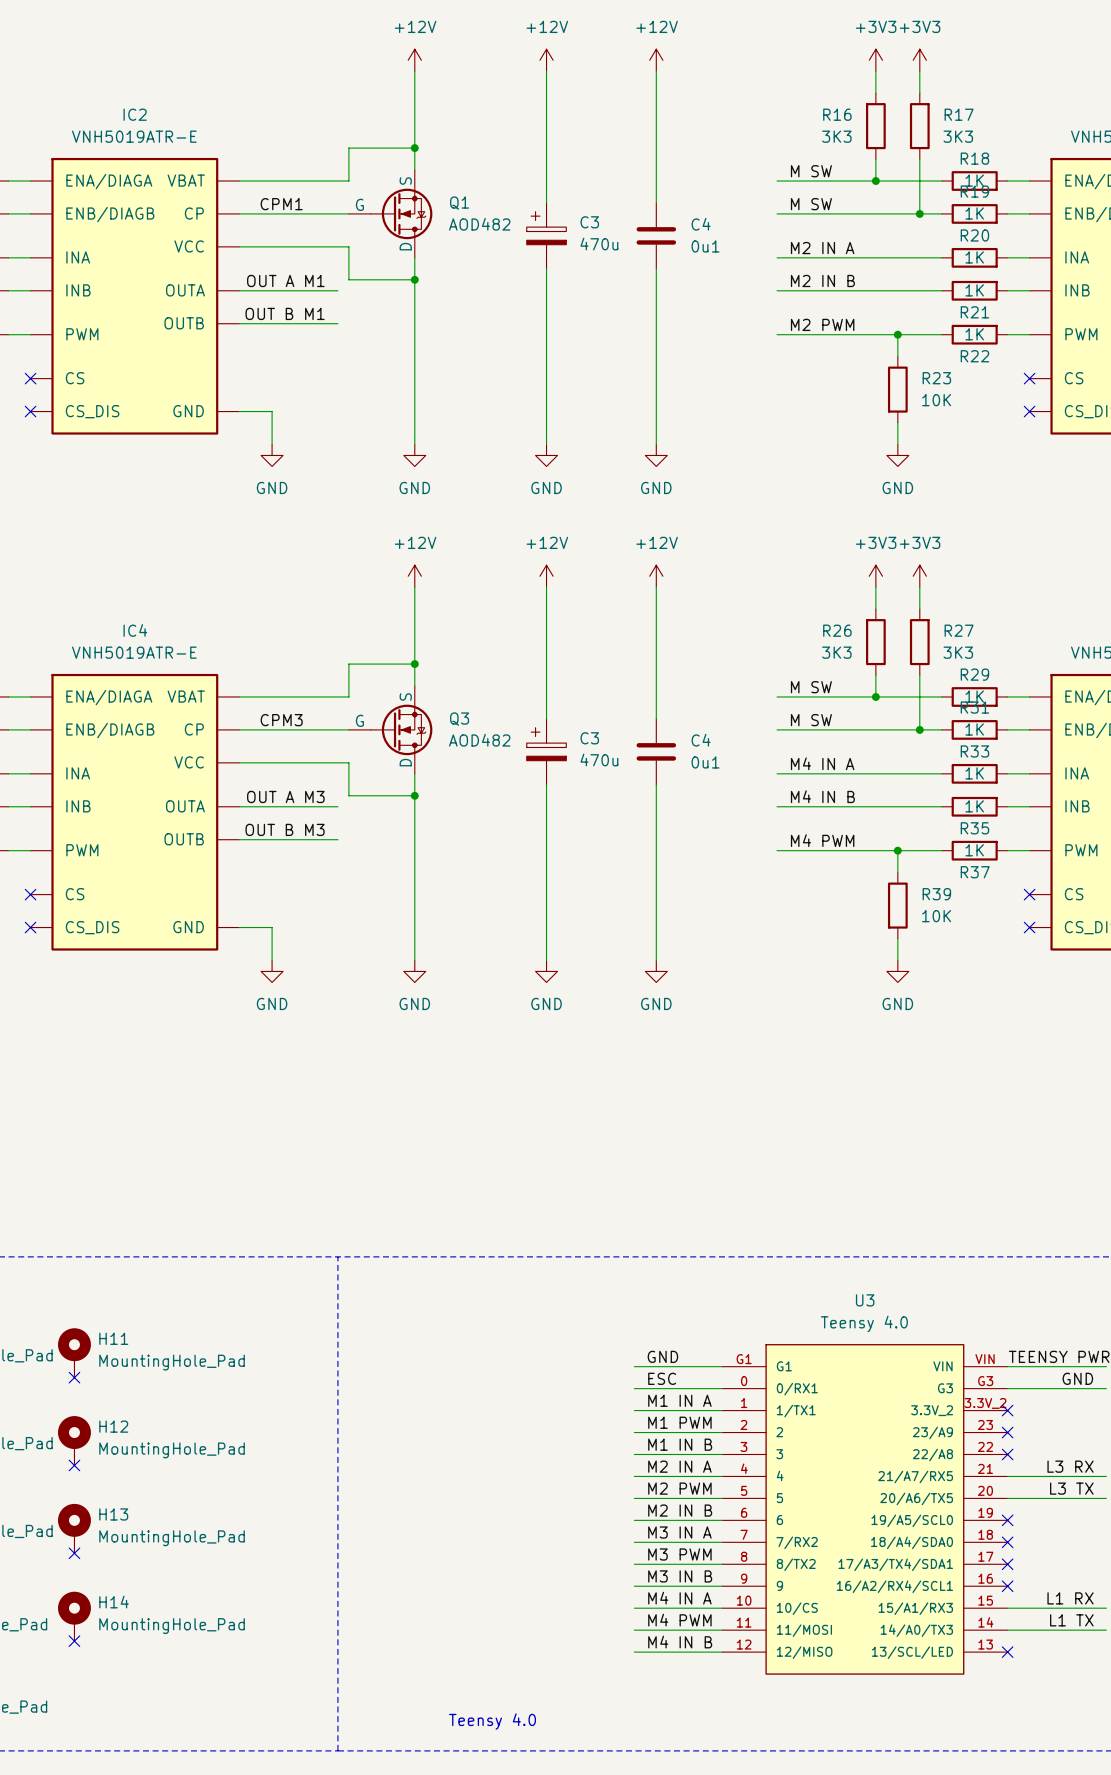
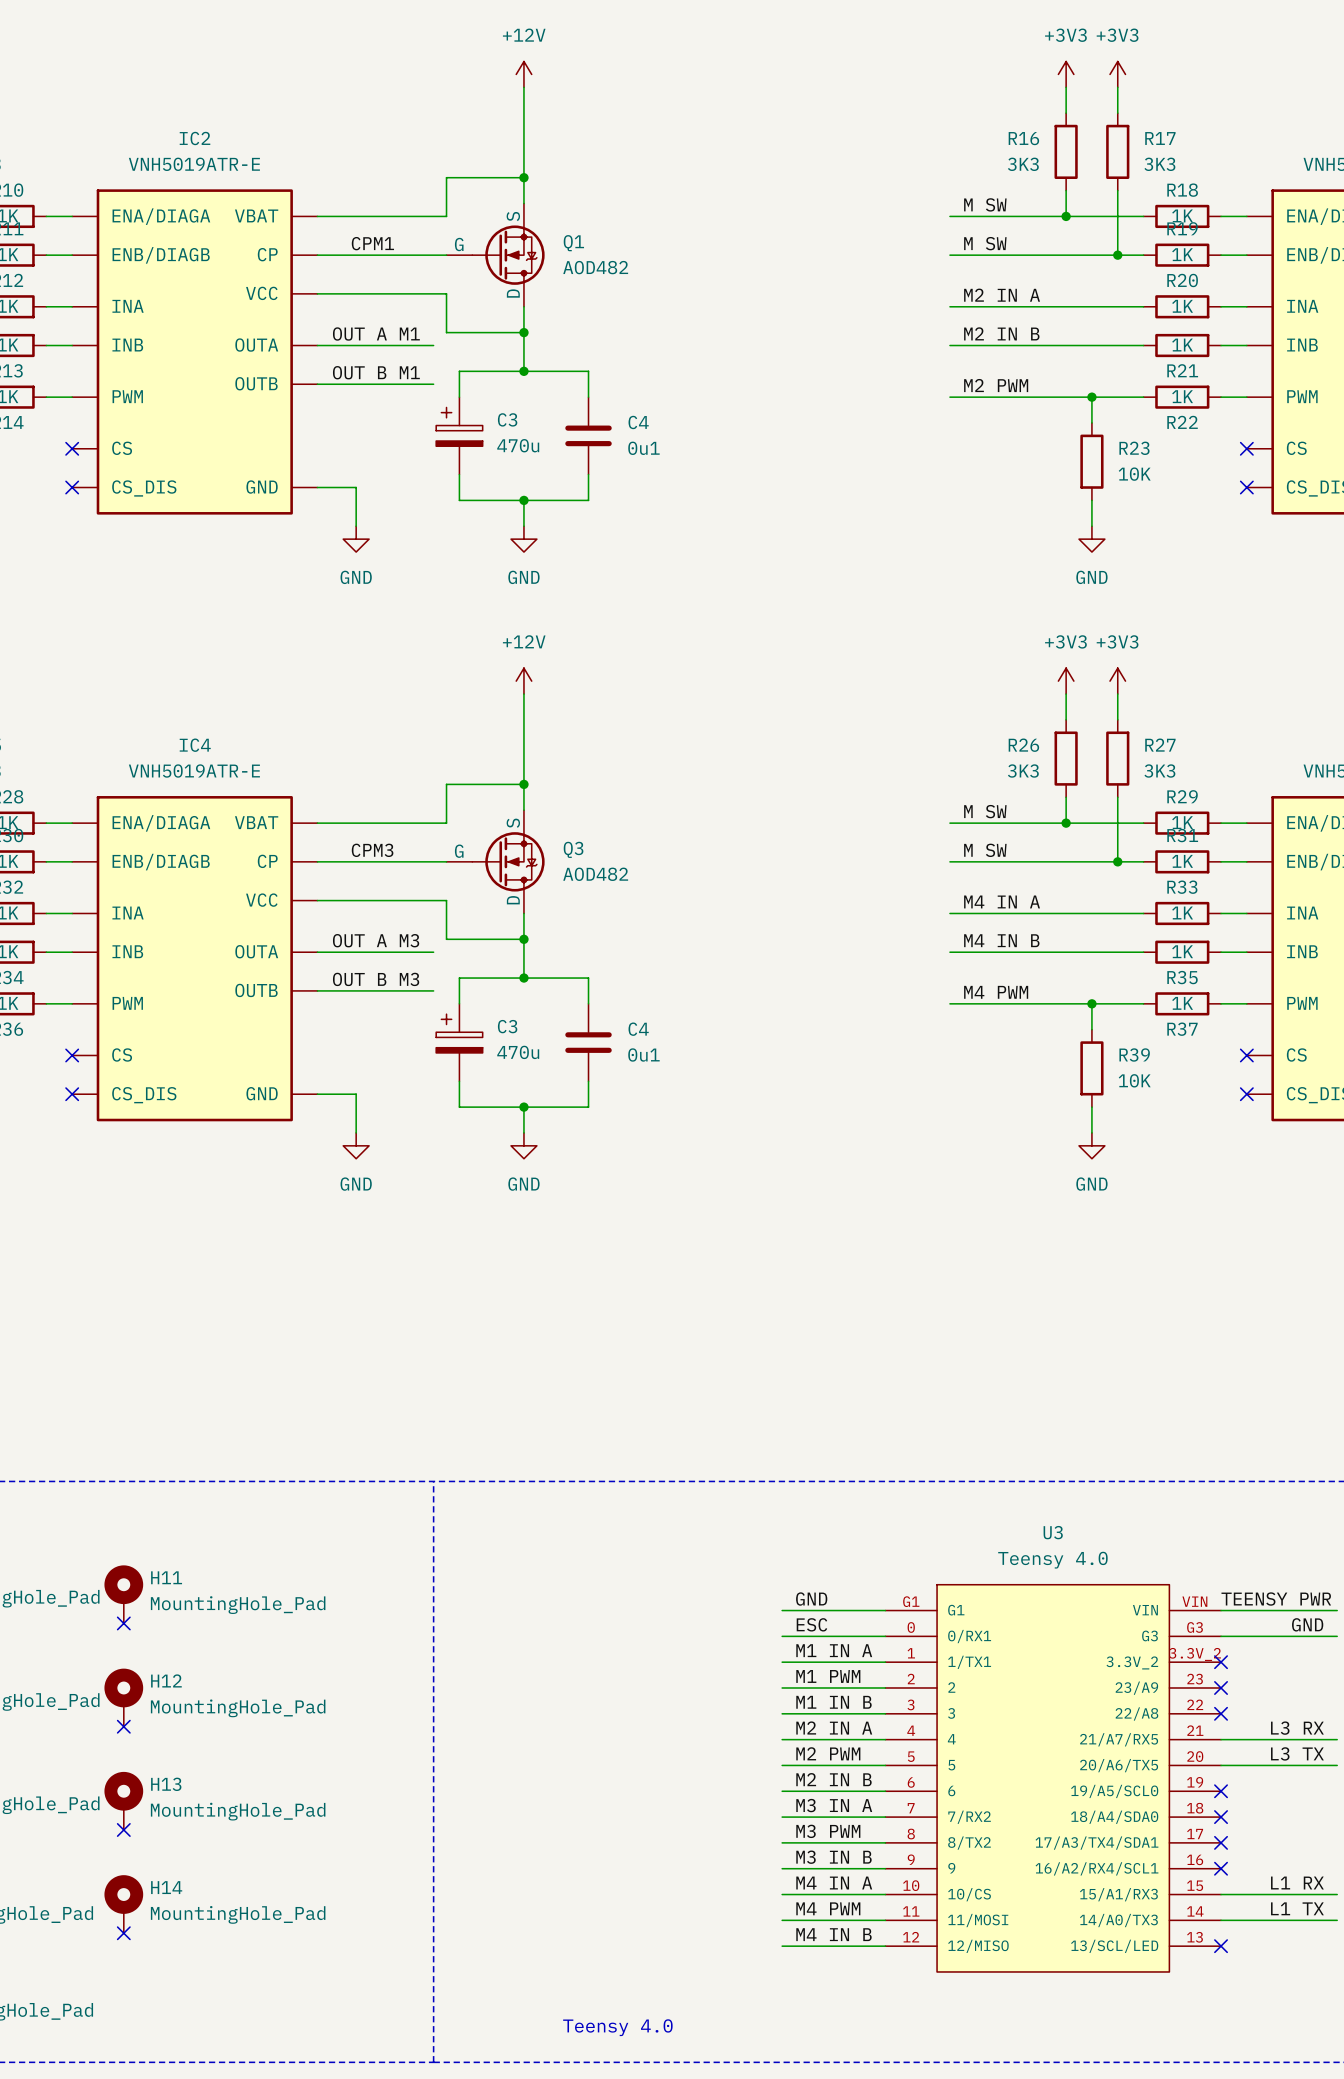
power symbol: +12V (546, 60) -> none
power symbol: +12V (656, 60) -> none
wire: (546, 71) (546, 202) -> none
wire: (656, 71) (656, 202) -> none
C3: 470u (546, 235) -> none
C4: 0u1 (656, 235) -> none
wire: (546, 268) (546, 444) -> none
wire: (656, 268) (656, 444) -> none
wire: (414, 312) (414, 422) -> none
junction: none -> (523, 371)
wire: none -> (459, 397) (459, 371) (588, 371) (588, 397)
C3: none -> 470u (459, 435)
C4: none -> 0u1 (588, 435)
wire: none -> (459, 474) (459, 500) (588, 500) (588, 474)
junction: none -> (523, 500)
power symbol: GND (546, 455) -> none
power symbol: GND (656, 455) -> none
power symbol: +12V (546, 576) -> none
power symbol: +12V (656, 576) -> none
wire: (546, 587) (546, 718) -> none
wire: (656, 587) (656, 718) -> none
C3: 470u (546, 751) -> none
C4: 0u1 (656, 751) -> none
wire: (546, 784) (546, 960) -> none
wire: (656, 784) (656, 960) -> none
wire: (414, 828) (414, 938) -> none
junction: none -> (523, 978)
wire: none -> (459, 1003) (459, 978) (588, 978) (588, 1003)
C3: none -> 470u (459, 1042)
C4: none -> 0u1 (588, 1042)
wire: none -> (459, 1081) (459, 1107) (588, 1107) (588, 1081)
junction: none -> (523, 1107)
power symbol: GND (546, 971) -> none
power symbol: GND (656, 971) -> none

